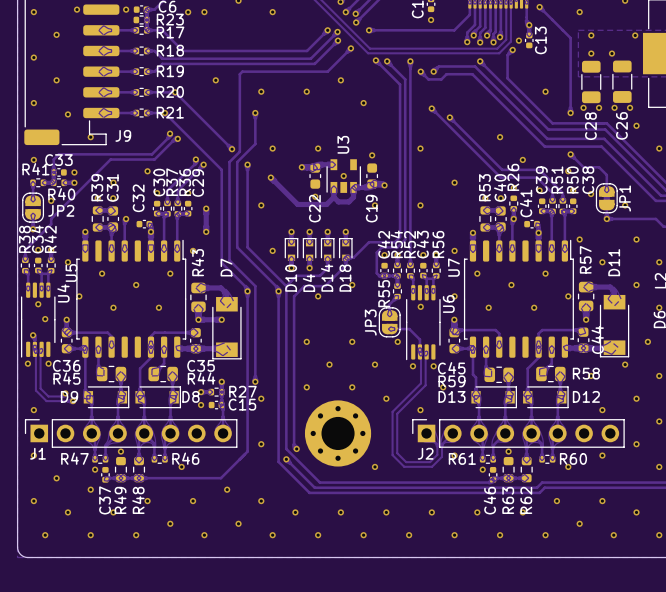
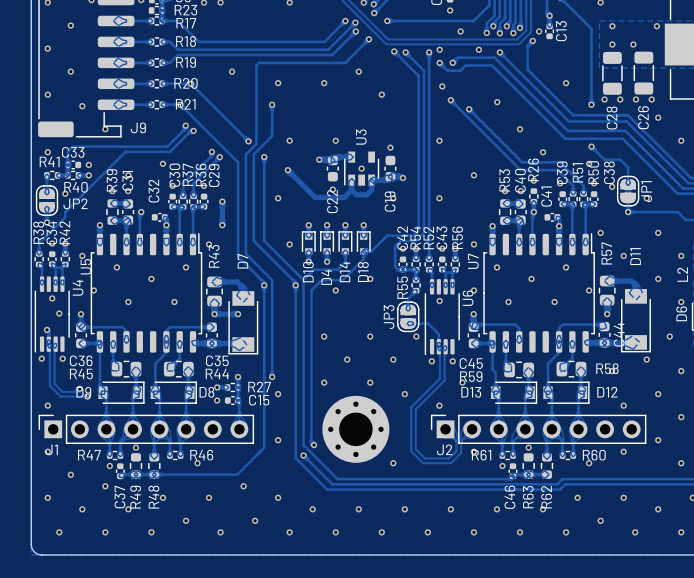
via: none -> (460, 31)
via: none -> (439, 49)
via: none -> (478, 49)
via: none -> (442, 86)
via: none -> (497, 102)

